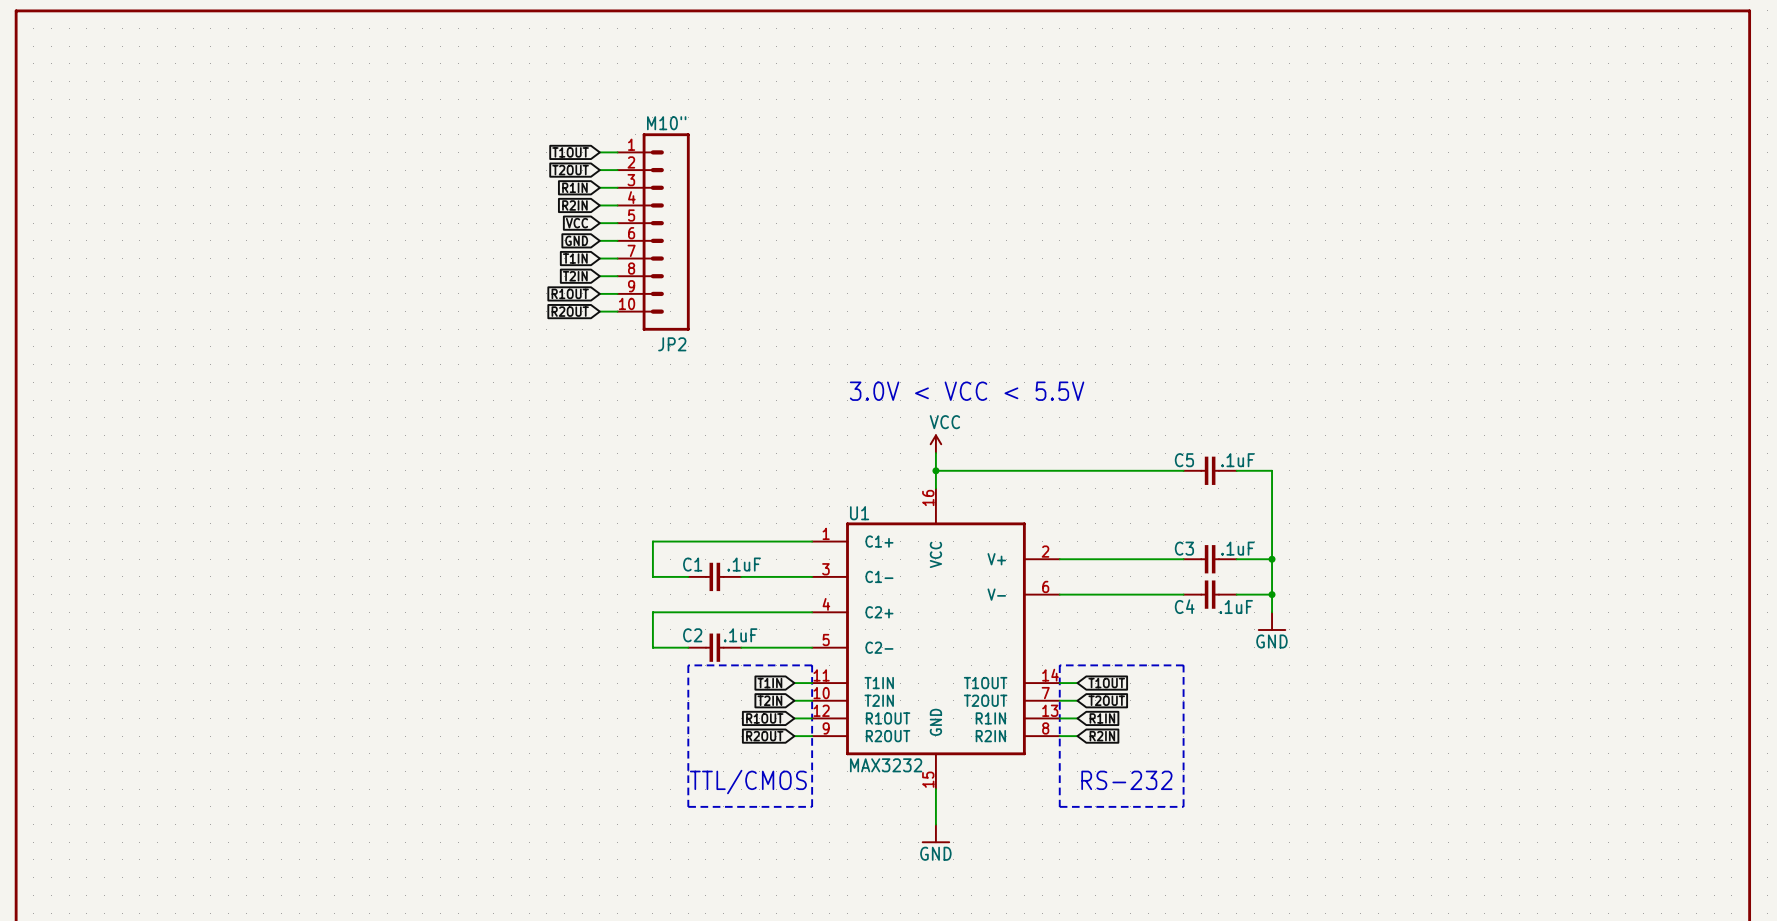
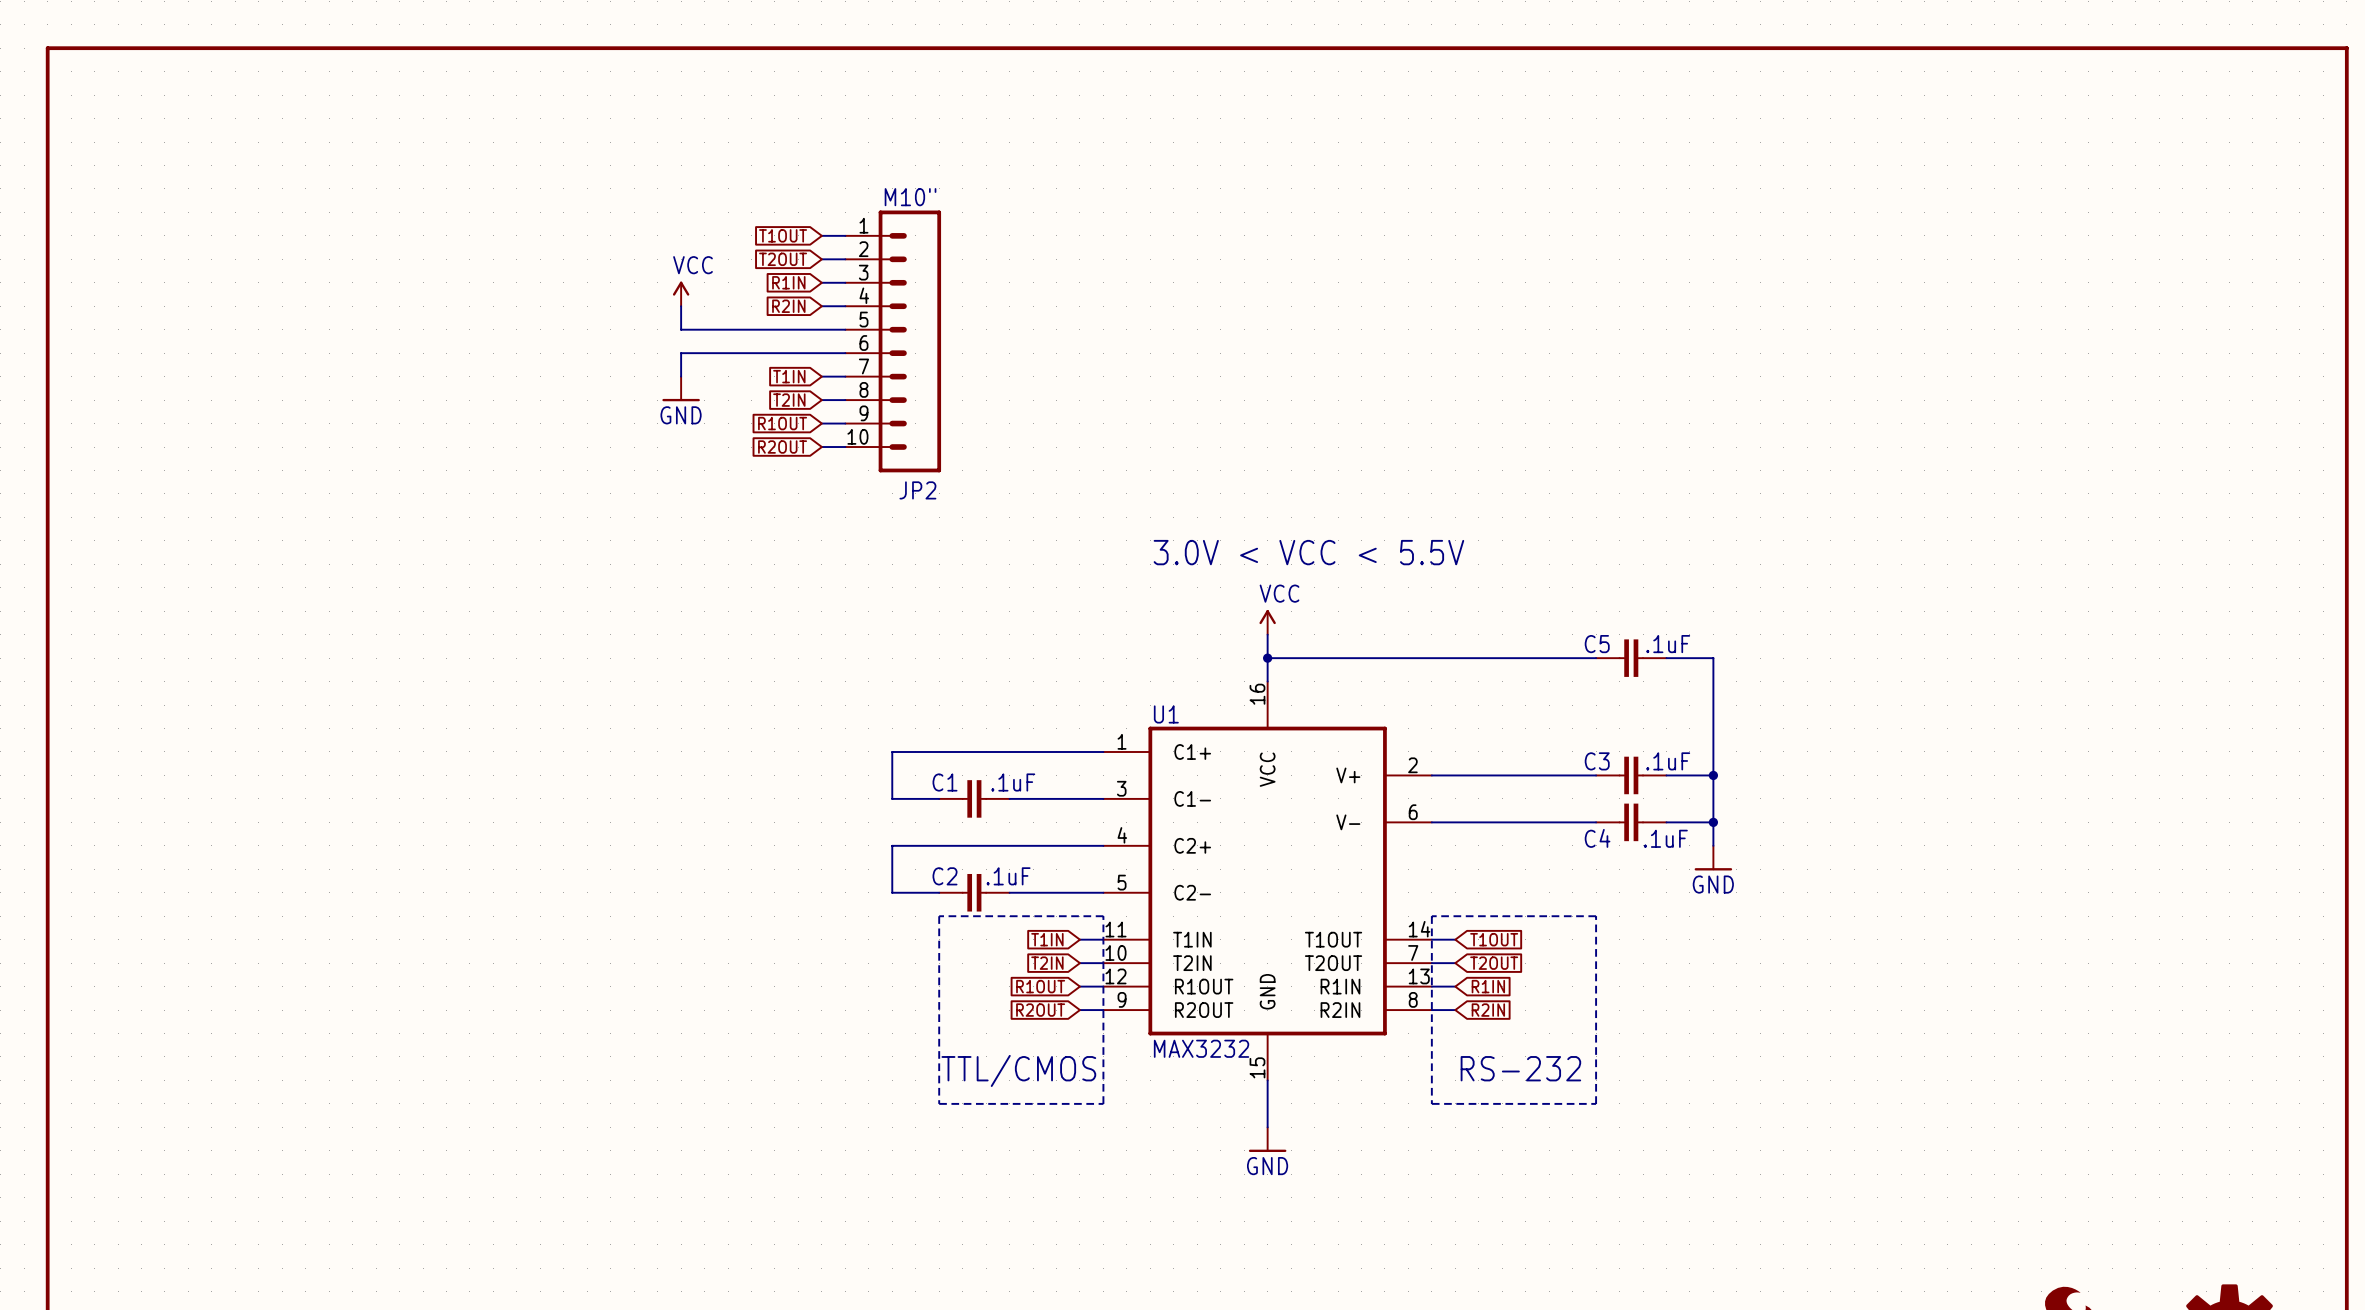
power symbol: none -> VCC (681, 293)
wire: none -> (681, 306) (681, 329) (821, 329)
global label: VCC (577, 223) -> none
global label: GND (576, 240) -> none
wire: none -> (821, 353) (681, 353) (681, 376)
power symbol: none -> GND (681, 388)

